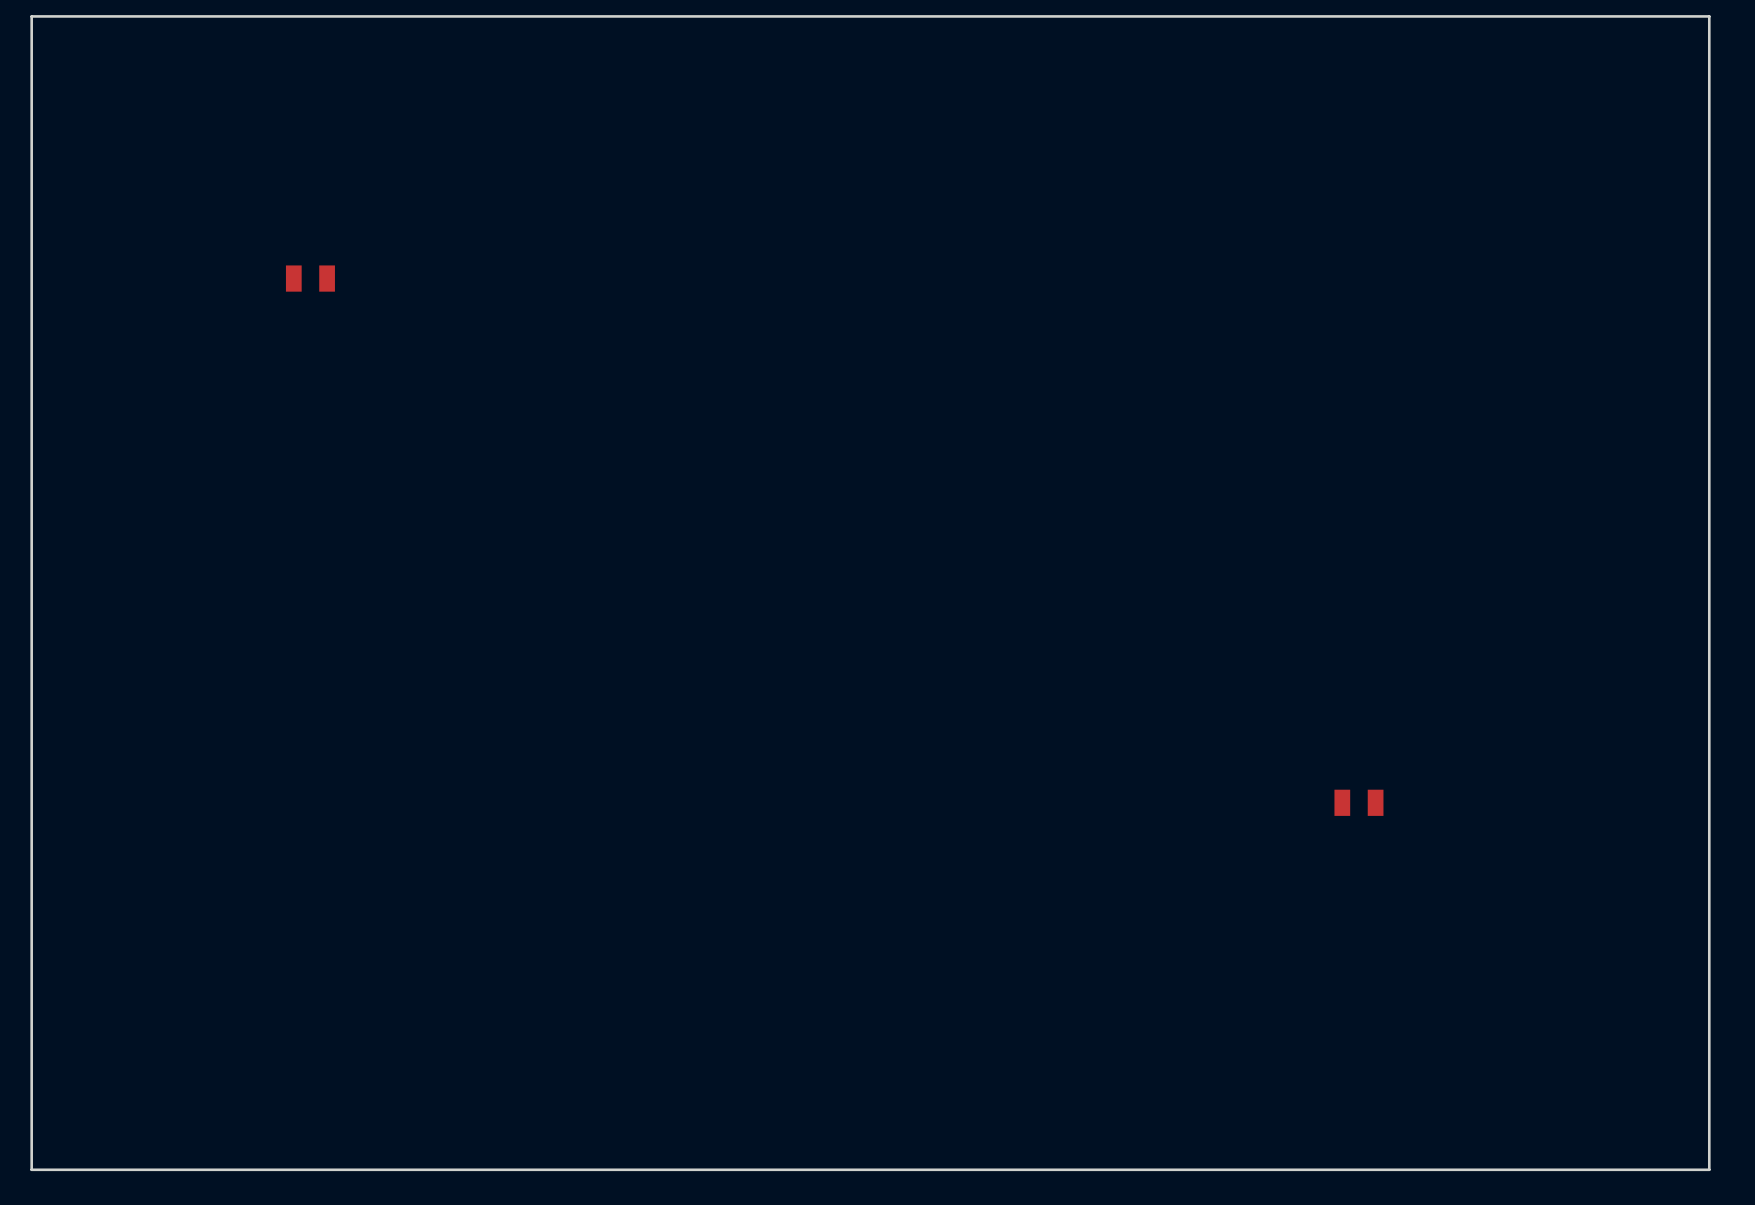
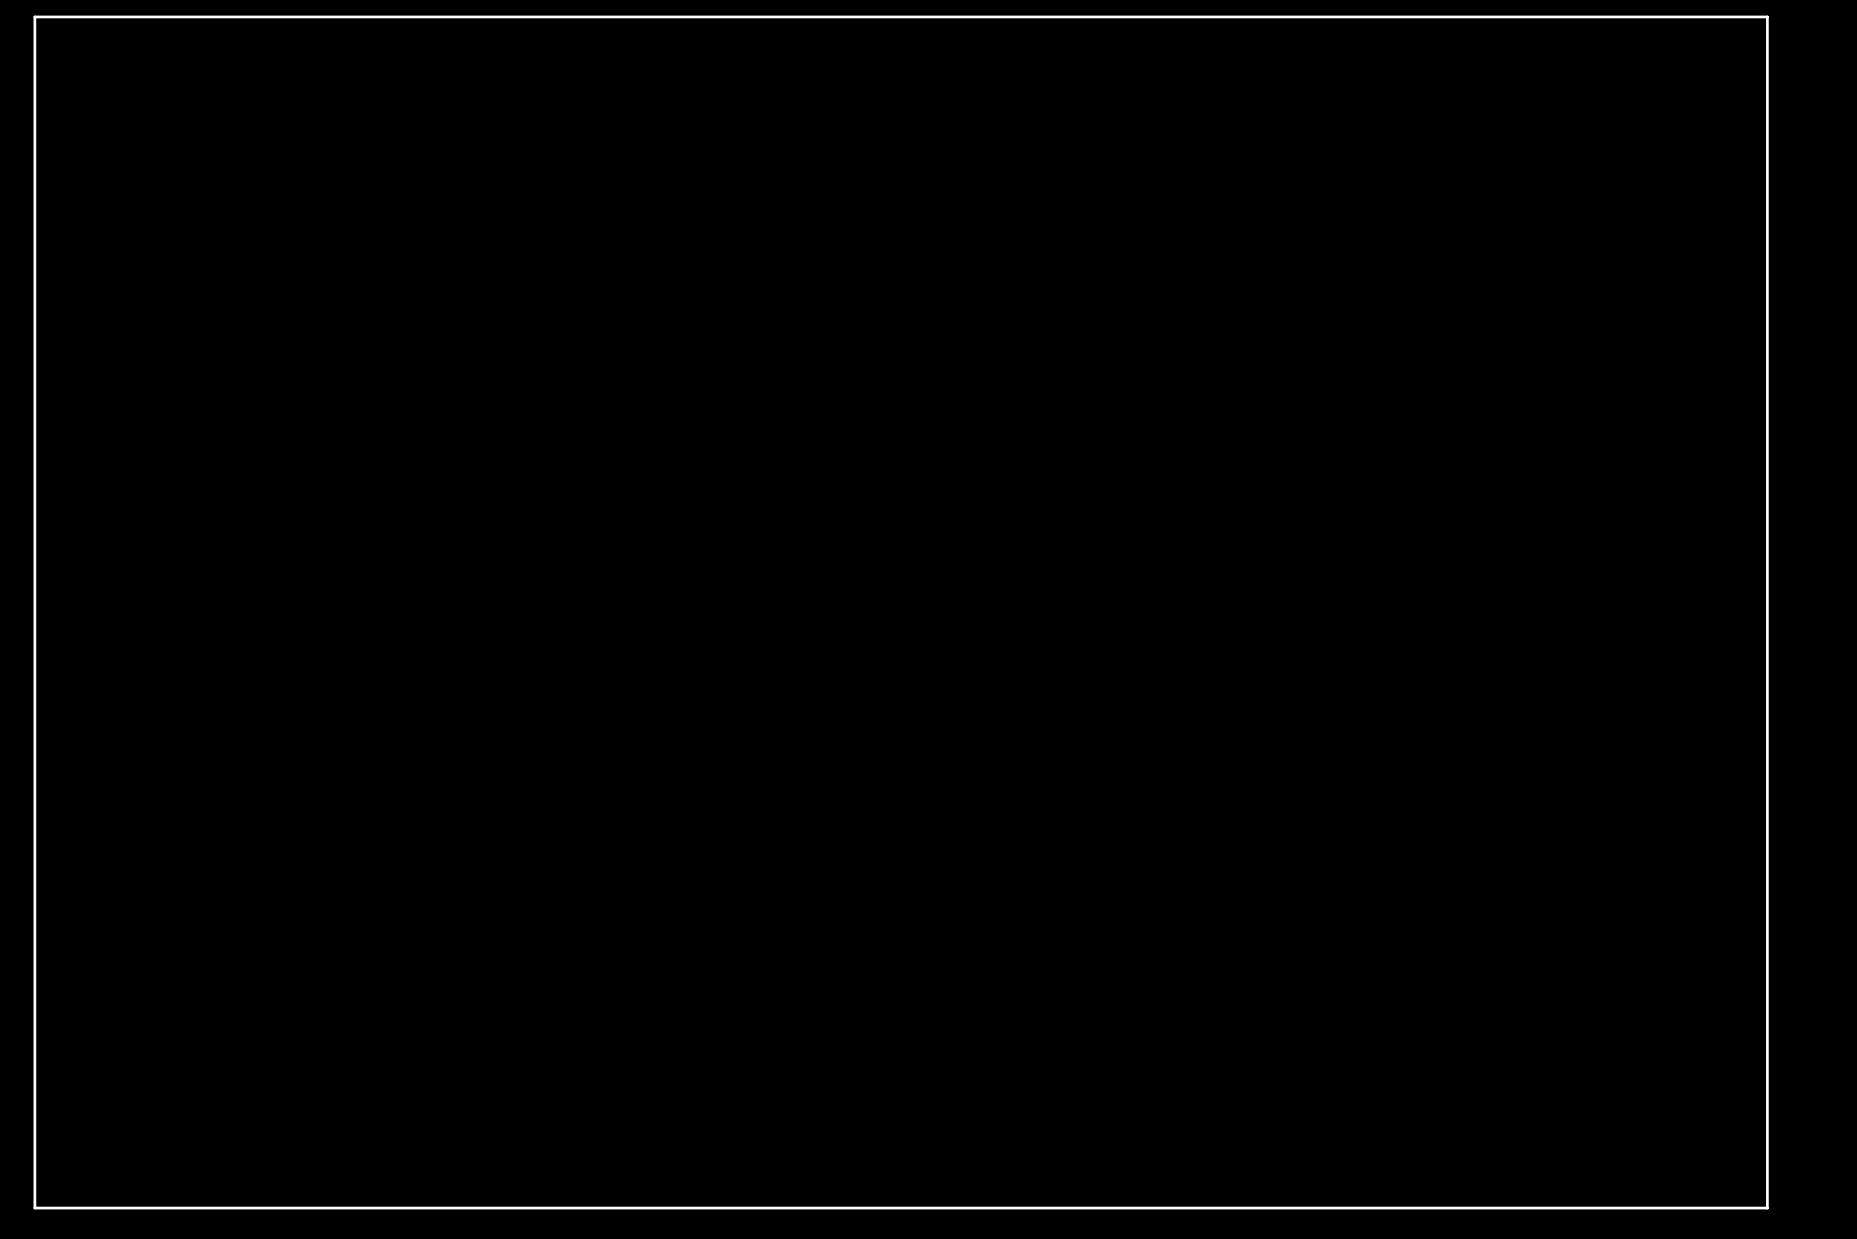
part: (310, 278) -> none
part: (1358, 802) -> none

